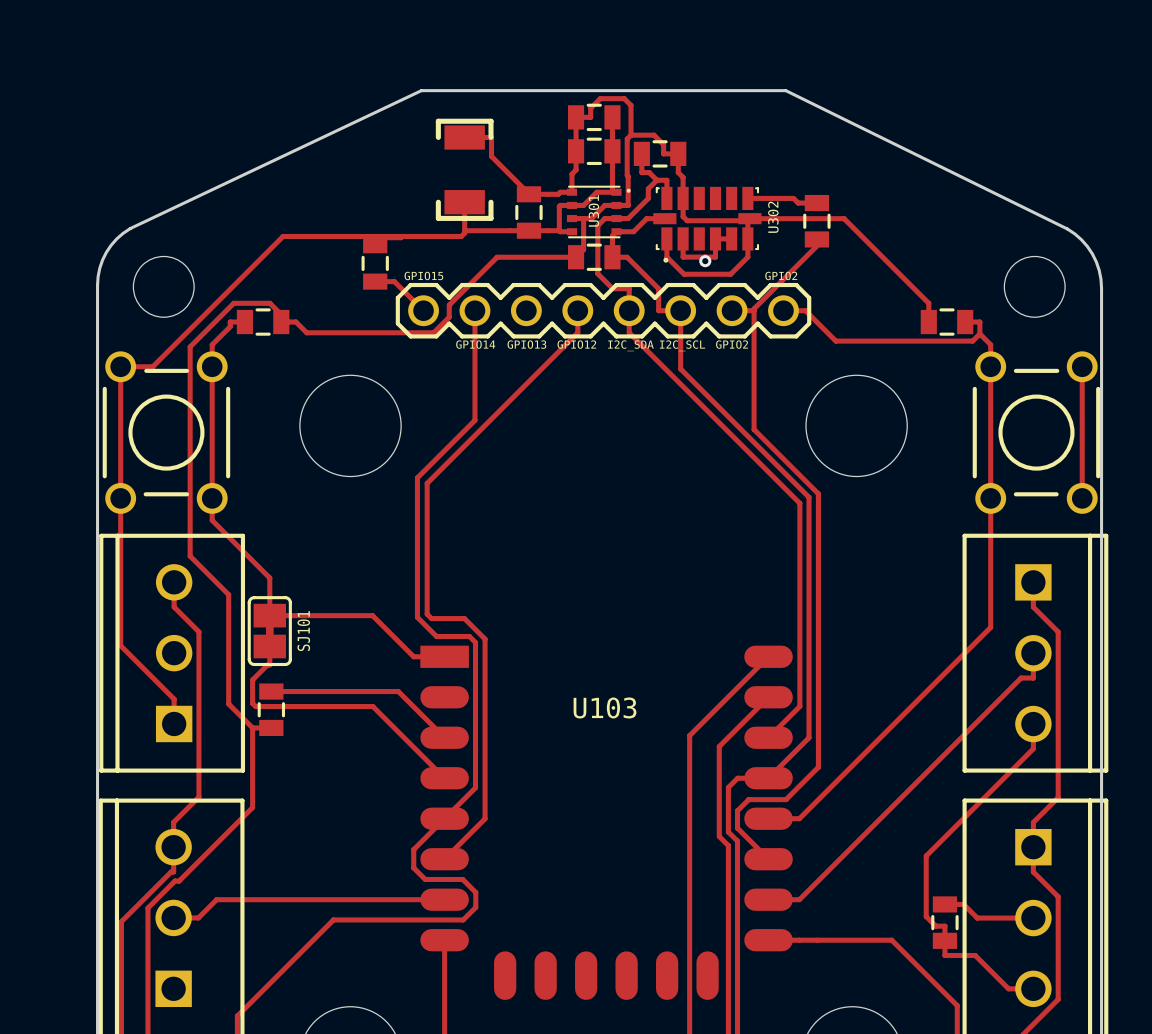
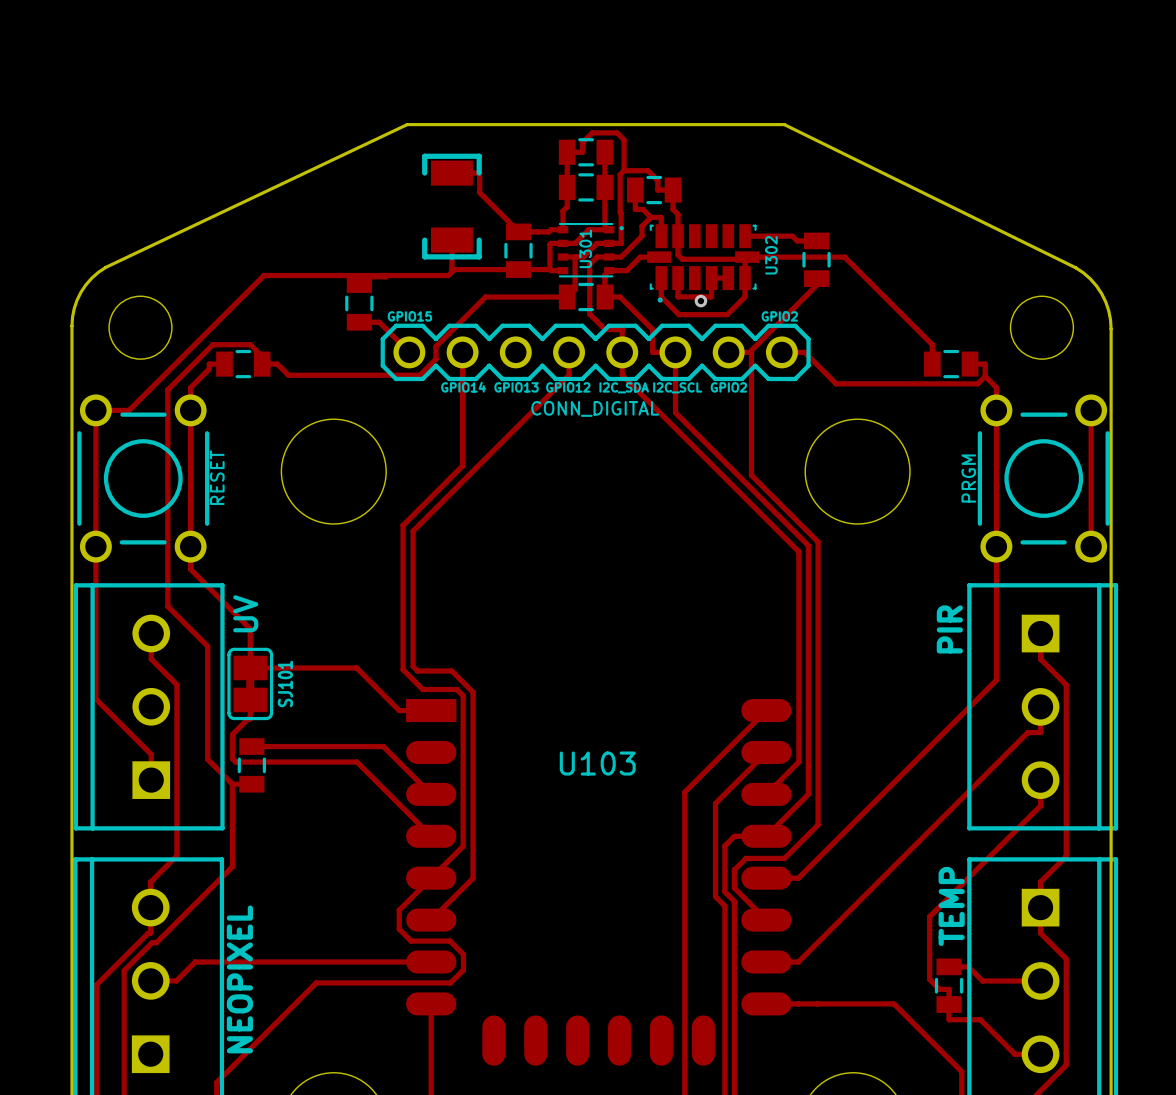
part value: none -> CONN_DIGITAL (595, 408)
part value: none -> RESET (217, 477)
part value: none -> PRGM (968, 478)
part value: none -> UV (245, 613)
part value: none -> PIR (949, 629)
part value: none -> TEMP (951, 906)
part value: none -> NEOPIXEL (239, 979)

